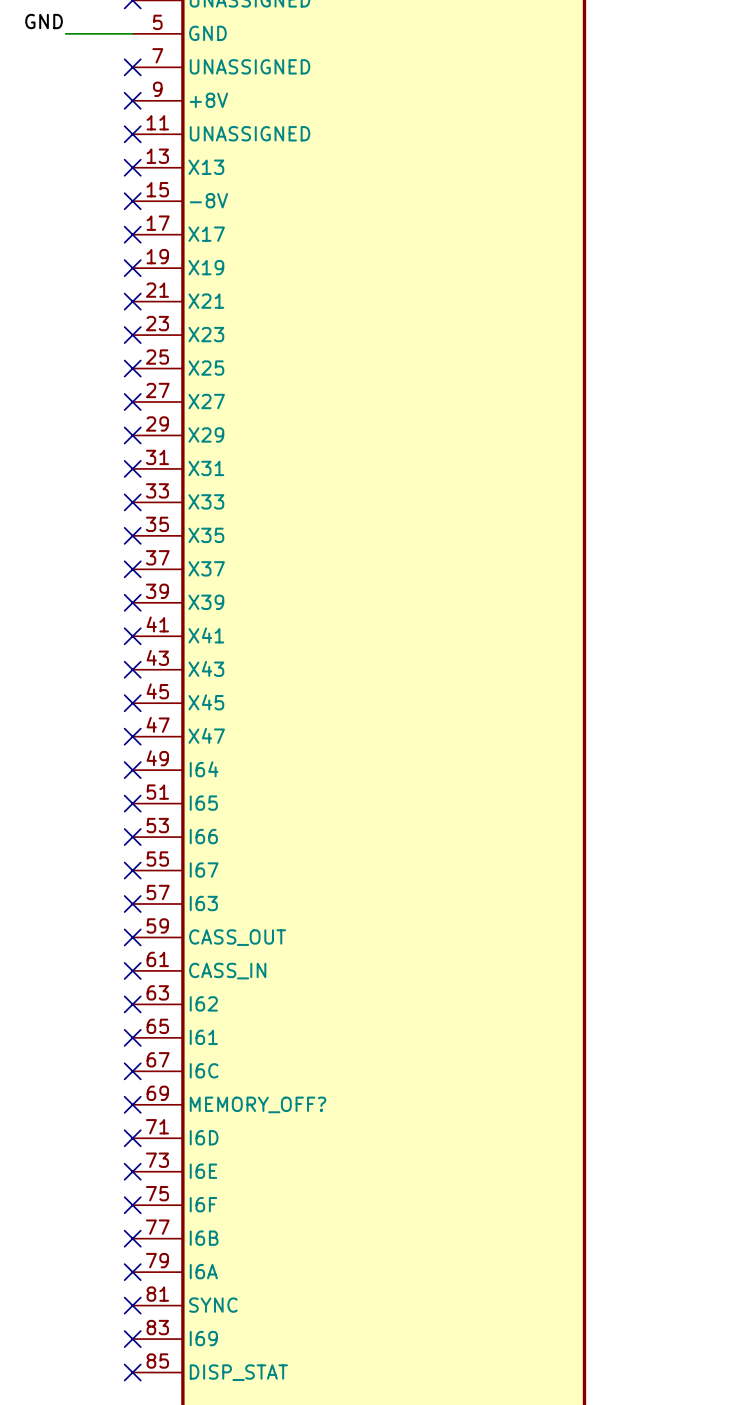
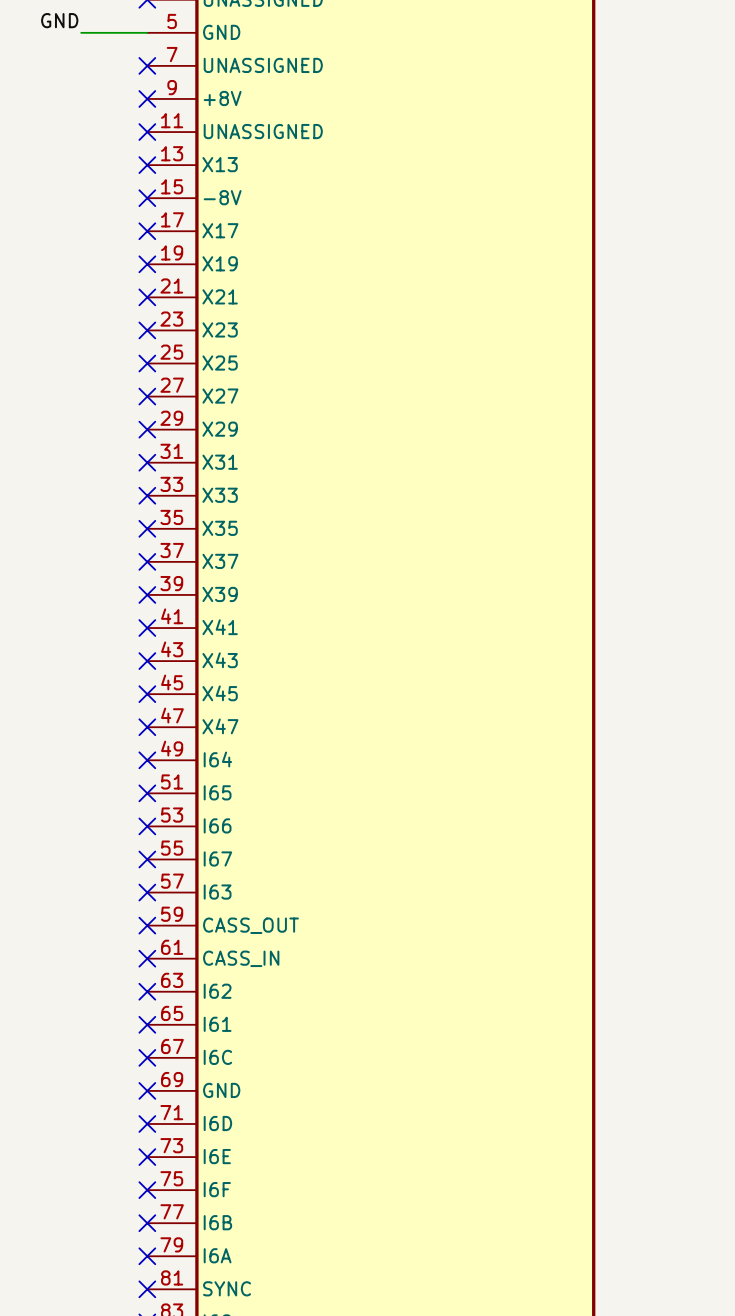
part pin name: MEMORY_OFF? (257, 1104) -> GND (221, 1090)

